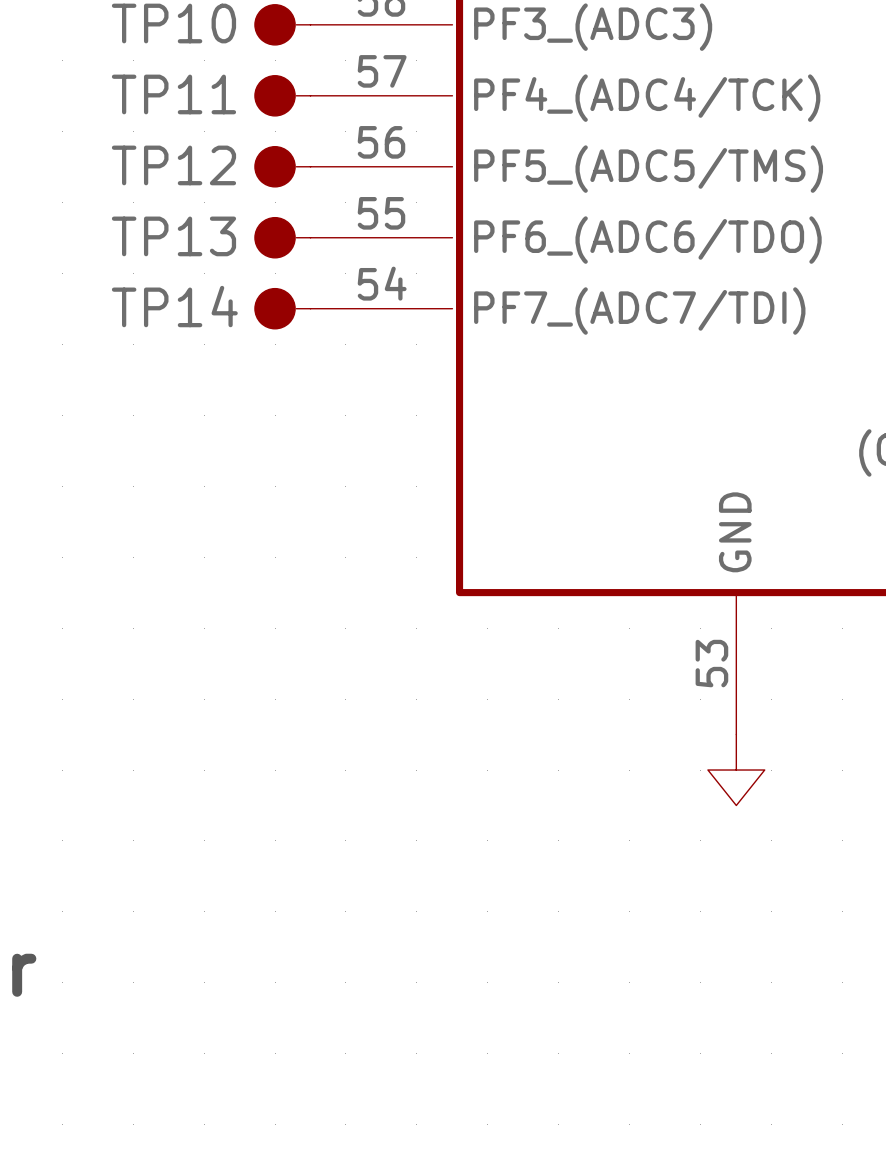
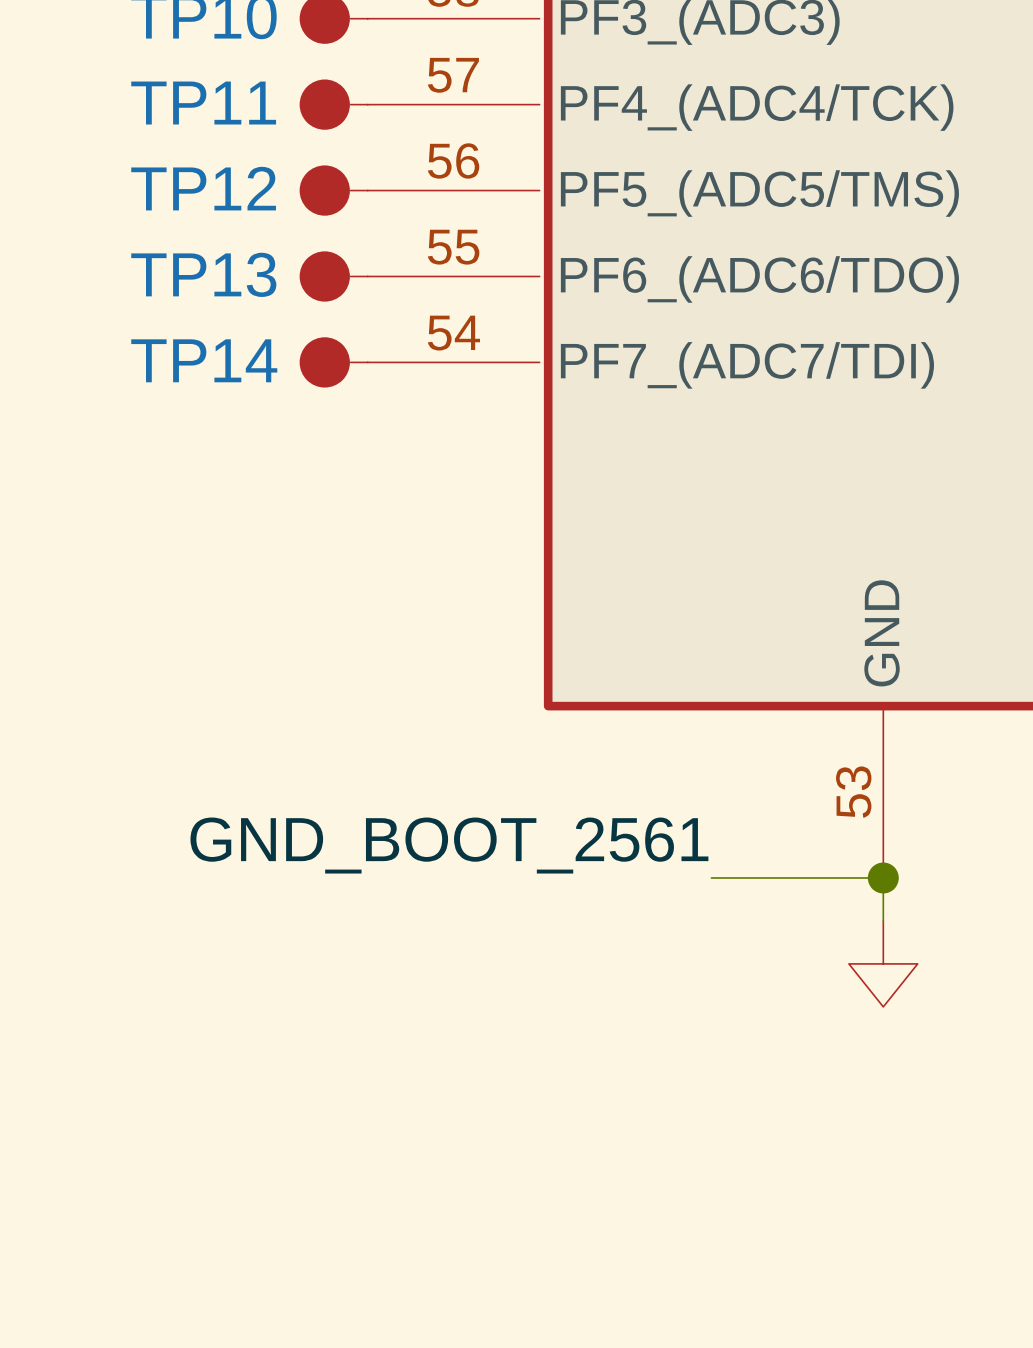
label: none -> GND_BOOT_2561 (449, 845)
wire: none -> (711, 877) (883, 877) (883, 920)
junction: none -> (883, 877)
power symbol position: (736, 770) -> (883, 963)

